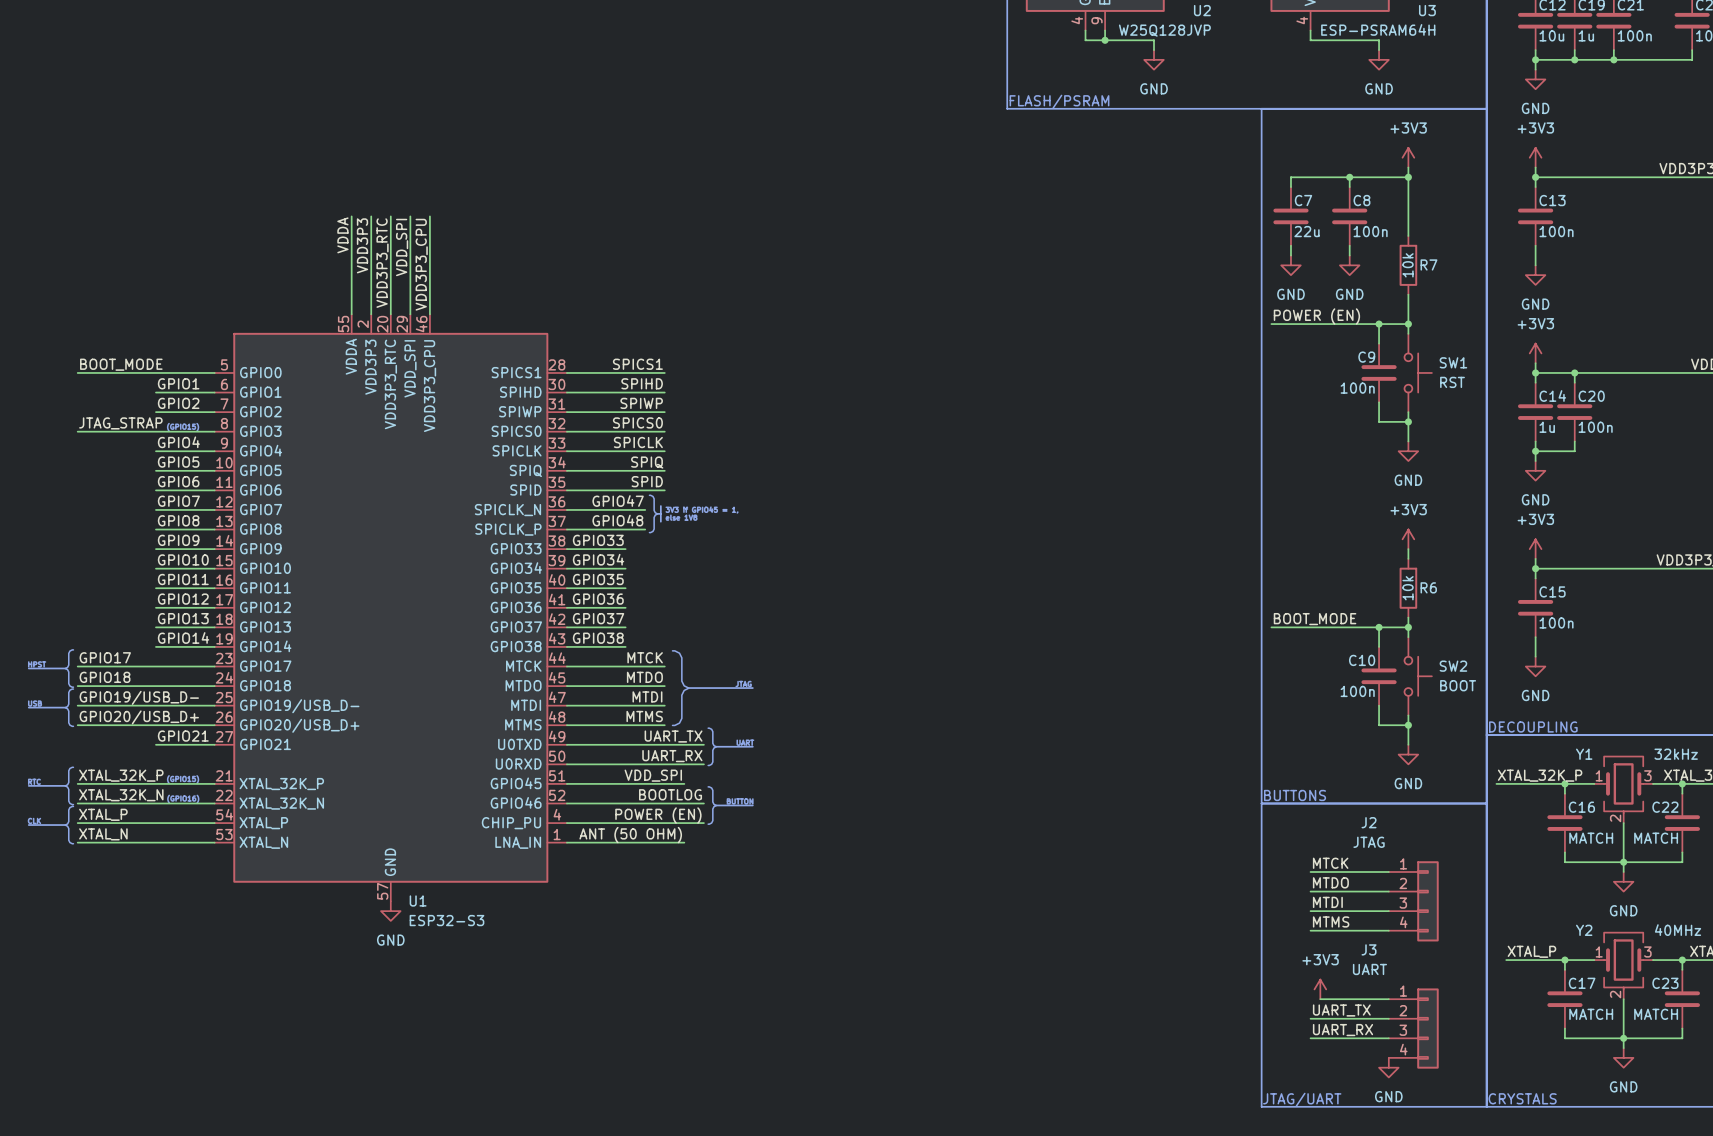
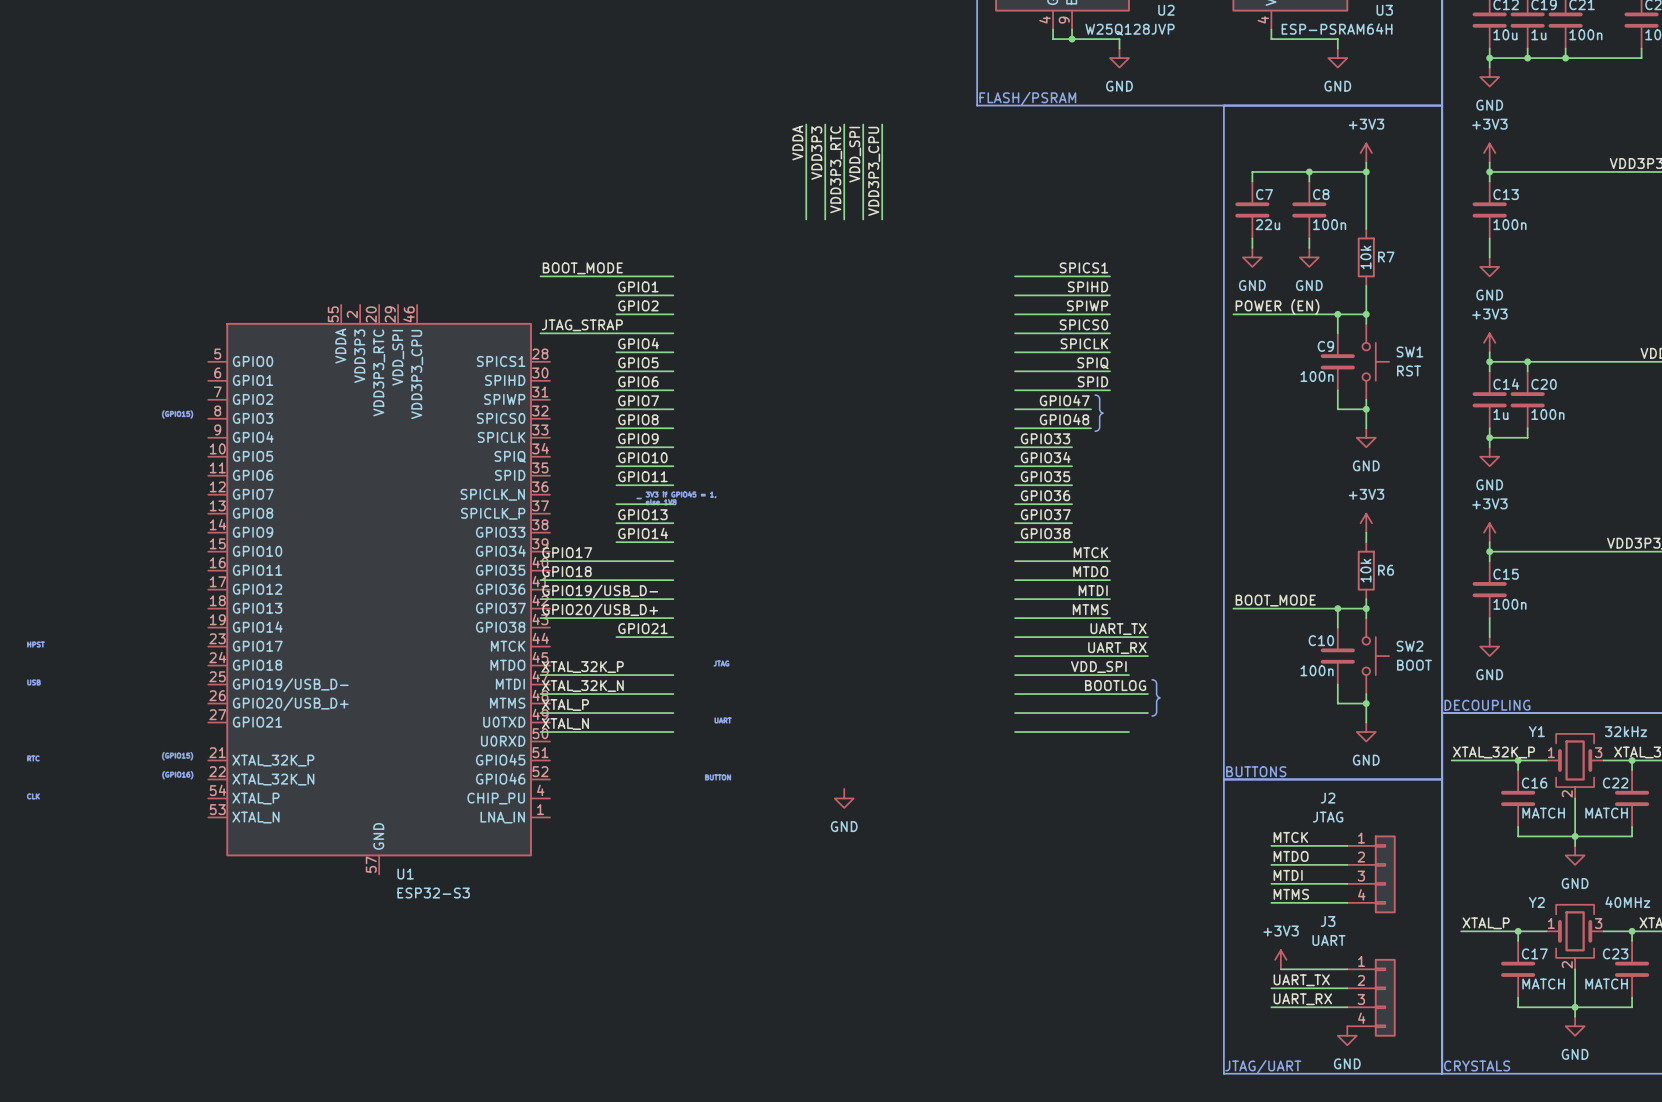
wire: none -> (806, 124) (806, 219)
wire: none -> (825, 124) (825, 219)
wire: none -> (844, 124) (844, 219)
wire: none -> (863, 124) (863, 219)
wire: none -> (882, 124) (882, 219)
label: none -> VDDA (797, 142)
label: none -> VDD3P3 (816, 153)
label: none -> VDD_SPI (855, 154)
label: none -> VDD3P3_RTC (836, 169)
label: none -> VDD3P3_CPU (874, 171)
wire: (351, 216) (351, 314) -> none
wire: (371, 216) (371, 314) -> none
wire: (390, 216) (390, 314) -> none
wire: (410, 216) (410, 314) -> none
wire: (429, 216) (429, 314) -> none
label: VDDA (342, 235) -> none
label: VDD3P3 (362, 245) -> none
label: VDD_SPI (402, 247) -> none
label: VDD3P3_RTC (382, 263) -> none
label: VDD3P3_CPU (421, 264) -> none
label: none -> BOOT_MODE (582, 268)
label: none -> SPICS1 (1083, 267)
wire: none -> (540, 276) (673, 276)
wire: none -> (1015, 276) (1110, 276)
label: none -> GPIO1 (638, 286)
label: none -> SPIHD (1088, 286)
wire: none -> (616, 295) (673, 295)
wire: none -> (1015, 295) (1110, 295)
label: none -> GPIO2 (638, 305)
label: none -> SPIWP (1087, 305)
wire: none -> (616, 314) (673, 314)
wire: none -> (1015, 314) (1110, 314)
label: none -> SPICS0 (1083, 324)
label: none -> JTAG_STRAP (582, 325)
wire: none -> (540, 333) (673, 333)
wire: none -> (1015, 333) (1110, 333)
label: none -> GPIO4 (638, 343)
label: none -> SPICLK (1084, 343)
wire: none -> (616, 352) (673, 352)
wire: none -> (1015, 352) (1110, 352)
label: BOOT_MODE (121, 364) -> none
label: SPICS1 (637, 364) -> none
wire: (77, 372) (214, 372) -> none
wire: (566, 372) (664, 372) -> none
label: none -> GPIO5 (638, 362)
label: none -> SPIQ (1092, 363)
wire: none -> (616, 371) (673, 371)
wire: none -> (1015, 371) (1110, 371)
label: GPIO1 (178, 383) -> none
label: SPIHD (642, 383) -> none
wire: (155, 392) (214, 392) -> none
wire: (566, 392) (664, 392) -> none
label: none -> GPIO6 (638, 381)
label: none -> SPID (1092, 381)
wire: none -> (616, 390) (673, 390)
wire: none -> (1015, 390) (1110, 390)
label: GPIO2 (178, 403) -> none
label: SPIWP (641, 403) -> none
wire: (155, 412) (214, 412) -> none
wire: (566, 412) (664, 412) -> none
label: none -> GPIO47 (1064, 400)
label: none -> GPIO7 (638, 400)
wire: none -> (616, 409) (673, 409)
wire: none -> (1015, 409) (1091, 409)
label: SPICS0 (637, 422) -> none
label: JTAG_STRAP (120, 423) -> none
text: none -> } (1099, 413)
wire: (77, 431) (214, 431) -> none
wire: (566, 431) (664, 431) -> none
label: none -> GPIO8 (638, 419)
label: none -> GPIO48 (1064, 419)
wire: none -> (616, 428) (673, 428)
wire: none -> (1015, 428) (1091, 428)
label: GPIO4 (178, 442) -> none
label: SPICLK (638, 442) -> none
wire: (155, 451) (214, 451) -> none
wire: (566, 451) (664, 451) -> none
label: none -> GPIO9 (638, 438)
label: none -> GPIO33 (1045, 438)
wire: none -> (1015, 447) (1072, 447)
label: GPIO5 (178, 462) -> none
label: SPIQ (647, 462) -> none
wire: (155, 470) (214, 470) -> none
wire: (566, 470) (664, 470) -> none
label: none -> GPIO10 (642, 457)
label: none -> GPIO34 (1045, 457)
wire: none -> (1015, 466) (1072, 466)
label: GPIO6 (178, 481) -> none
label: SPID (647, 481) -> none
wire: (155, 490) (214, 490) -> none
wire: (566, 490) (664, 490) -> none
label: none -> GPIO35 (1045, 476)
wire: none -> (1015, 485) (1072, 485)
label: GPIO7 (178, 501) -> none
label: GPIO47 (618, 501) -> GPIO11 (642, 476)
line: (660, 506) (660, 521) -> none
wire: (155, 509) (214, 509) -> none
wire: (566, 509) (645, 509) -> none
label: none -> GPIO36 (1045, 495)
text: } (653, 513) -> none
wire: none -> (1015, 504) (1072, 504)
label: GPIO8 (178, 520) -> none
label: GPIO48 (617, 520) -> GPIO13 (642, 514)
wire: (155, 529) (214, 529) -> none
wire: (566, 529) (645, 529) -> none
label: none -> GPIO37 (1045, 514)
wire: none -> (1015, 523) (1072, 523)
label: GPIO9 (178, 540) -> none
label: GPIO33 (598, 540) -> none
wire: (155, 549) (214, 549) -> none
wire: (566, 549) (625, 549) -> (616, 447) (673, 447)
label: none -> GPIO14 (643, 533)
label: none -> GPIO38 (1045, 533)
wire: none -> (1015, 542) (1072, 542)
label: GPIO10 (183, 559) -> none
label: GPIO34 (598, 559) -> none
wire: (155, 568) (214, 568) -> none
wire: (566, 568) (625, 568) -> (616, 466) (673, 466)
label: none -> GPIO17 (567, 552)
label: none -> MTCK (1090, 552)
wire: none -> (540, 561) (673, 561)
wire: none -> (1015, 561) (1110, 561)
label: GPIO11 (183, 579) -> none
label: GPIO35 (598, 579) -> none
wire: (155, 588) (214, 588) -> none
wire: (566, 588) (625, 588) -> (616, 485) (673, 485)
label: none -> GPIO18 (566, 571)
label: none -> MTDO (1090, 571)
wire: none -> (540, 580) (673, 580)
wire: none -> (1015, 580) (1110, 580)
label: GPIO12 (183, 599) -> none
label: GPIO36 (598, 599) -> none
wire: (155, 607) (214, 607) -> none
wire: (566, 607) (625, 607) -> (616, 504) (673, 504)
label: none -> MTDI (1093, 590)
label: none -> GPIO19/USB_D- (600, 591)
wire: none -> (540, 599) (673, 599)
wire: none -> (1015, 599) (1110, 599)
label: GPIO13 (183, 618) -> none
label: GPIO37 (598, 618) -> none
wire: (155, 627) (214, 627) -> none
wire: (566, 627) (625, 627) -> (616, 523) (673, 523)
label: none -> MTMS (1090, 609)
label: none -> GPIO20/USB_D+ (600, 610)
label: GPIO14 (183, 637) -> none
wire: none -> (1015, 618) (1110, 618)
label: GPIO38 (598, 638) -> none
wire: (155, 646) (214, 646) -> none
wire: (566, 646) (625, 646) -> (616, 542) (673, 542)
label: none -> GPIO21 (642, 628)
label: none -> UART_TX (1118, 629)
wire: none -> (616, 637) (673, 637)
wire: none -> (1015, 637) (1147, 637)
label: GPIO17 (105, 657) -> none
label: MTCK (645, 657) -> none
wire: (77, 666) (214, 666) -> none
wire: (566, 666) (664, 666) -> none
line: (28, 668) (65, 668) -> none
text: { (69, 668) -> none
label: none -> UART_RX (1117, 648)
wire: none -> (1015, 656) (1147, 656)
label: GPIO18 (105, 677) -> none
label: MTDO (644, 677) -> none
wire: (77, 686) (214, 686) -> none
wire: (566, 686) (664, 686) -> none
label: none -> XTAL_32K_P (582, 667)
label: none -> VDD_SPI (1098, 667)
text: } (680, 688) -> none
line: (688, 688) (752, 688) -> none
wire: none -> (1015, 675) (1128, 675)
label: MTDI (647, 696) -> none
label: GPIO19/USB_D- (139, 697) -> none
wire: (77, 705) (214, 705) -> none
wire: (566, 705) (664, 705) -> none
label: none -> BOOTLOG (1115, 685)
line: (28, 707) (65, 707) -> none
text: { (69, 707) -> none
label: none -> XTAL_32K_N (582, 686)
wire: none -> (1015, 694) (1147, 694)
label: MTMS (644, 716) -> none
label: GPIO20/USB_D+ (139, 717) -> none
text: none -> } (1156, 697)
wire: (77, 725) (214, 725) -> none
wire: (566, 725) (664, 725) -> none
label: none -> XTAL_P (565, 705)
wire: none -> (540, 713) (673, 713)
wire: none -> (1015, 713) (1147, 713)
label: GPIO21 (183, 736) -> none
label: UART_TX (673, 736) -> none
wire: (155, 744) (214, 744) -> none
wire: (566, 744) (703, 744) -> (540, 675) (673, 675)
label: none -> XTAL_N (565, 723)
text: } (712, 746) -> none
line: (715, 746) (752, 746) -> none
wire: none -> (1015, 732) (1128, 732)
label: UART_RX (672, 756) -> none
wire: (566, 764) (703, 764) -> (540, 694) (673, 694)
label: XTAL_32K_P (121, 775) -> none
label: VDD_SPI (653, 775) -> none
wire: (77, 783) (214, 783) -> none
wire: (566, 783) (684, 783) -> none
line: (28, 785) (65, 785) -> none
text: { (69, 785) -> none
label: BOOTLOG (670, 794) -> none
label: XTAL_32K_N (121, 795) -> none
wire: (77, 803) (214, 803) -> none
wire: (566, 803) (703, 803) -> (540, 732) (673, 732)
text: } (712, 805) -> none
line: (715, 805) (752, 805) -> none
label: XTAL_P (103, 814) -> none
label: POWER (EN) (658, 815) -> none
wire: (77, 823) (214, 823) -> none
wire: (566, 823) (703, 823) -> (540, 618) (673, 618)
power symbol: none -> GND (844, 798)
line: (28, 825) (65, 825) -> none
text: { (69, 825) -> none
label: XTAL_N (103, 834) -> none
label: ANT (50 OHM) (630, 835) -> none
wire: (77, 842) (214, 842) -> none
wire: (566, 842) (684, 842) -> none
power symbol: GND (390, 911) -> none

